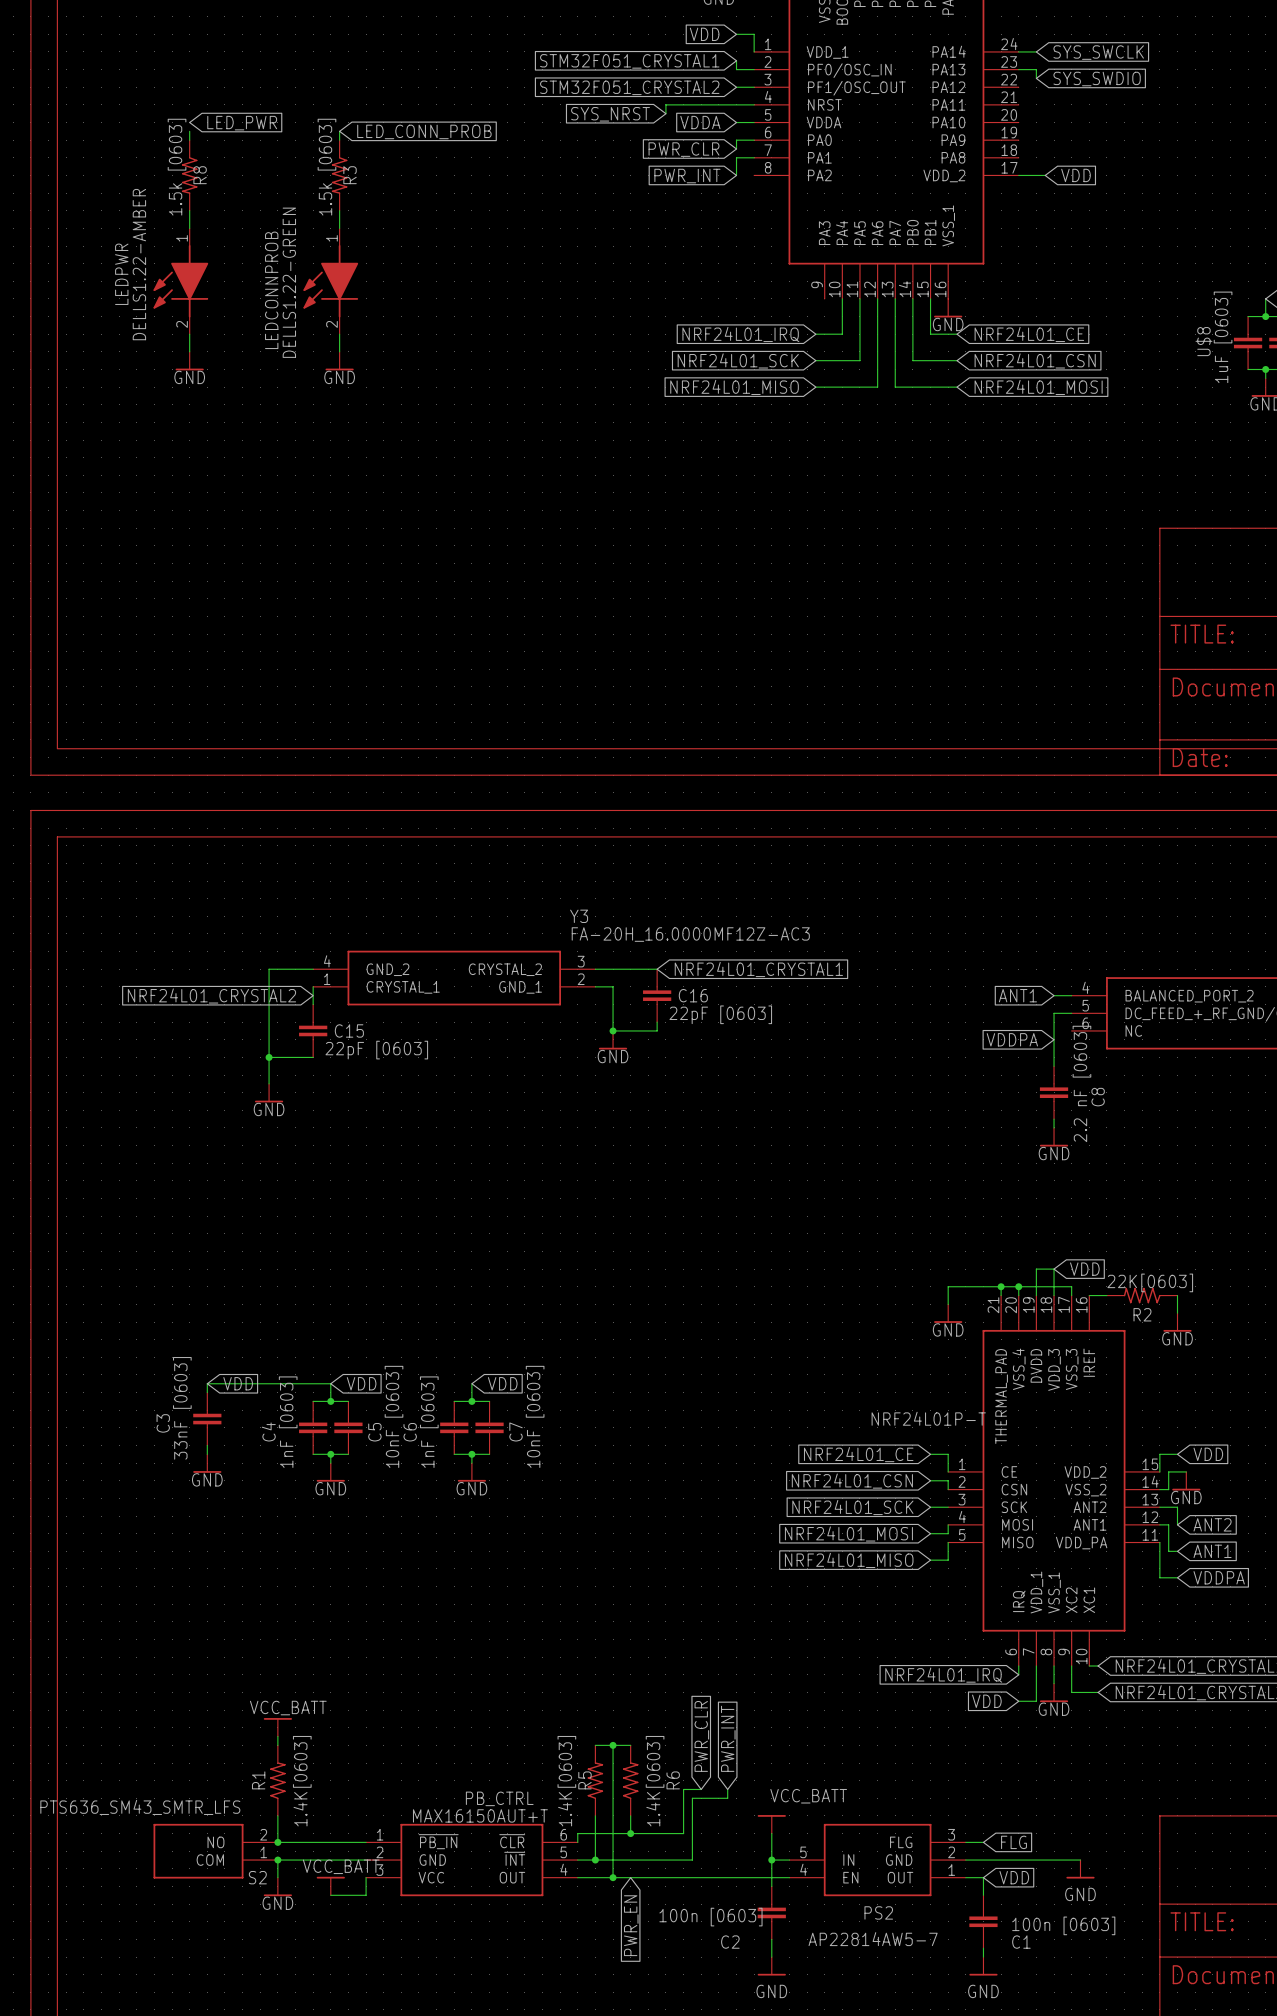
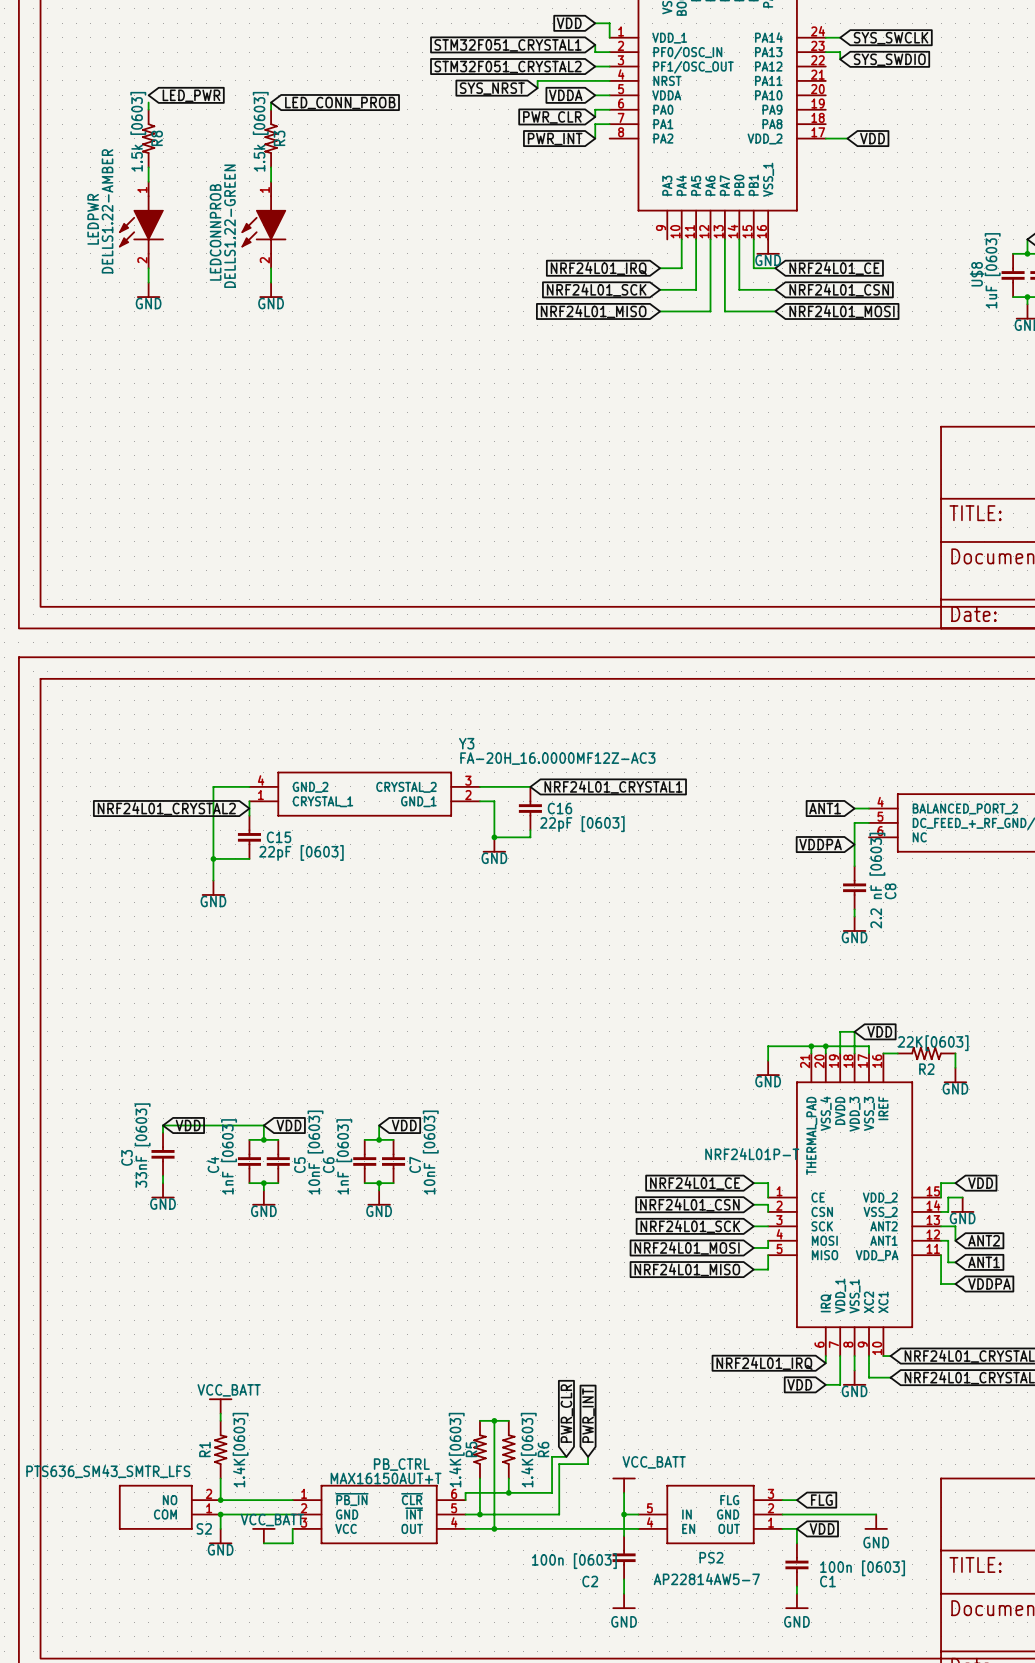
global label: PWR_EN (631, 1925) -> none

